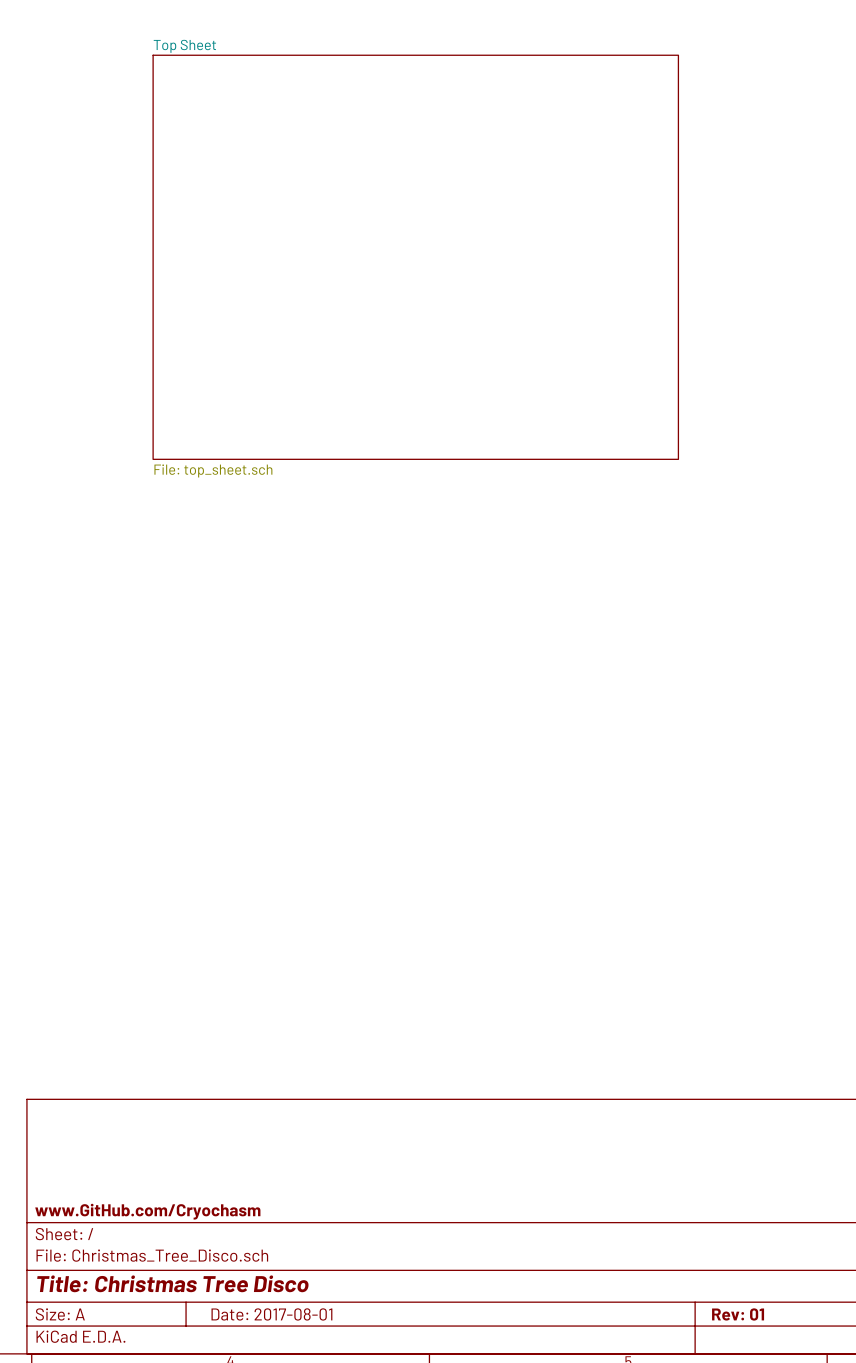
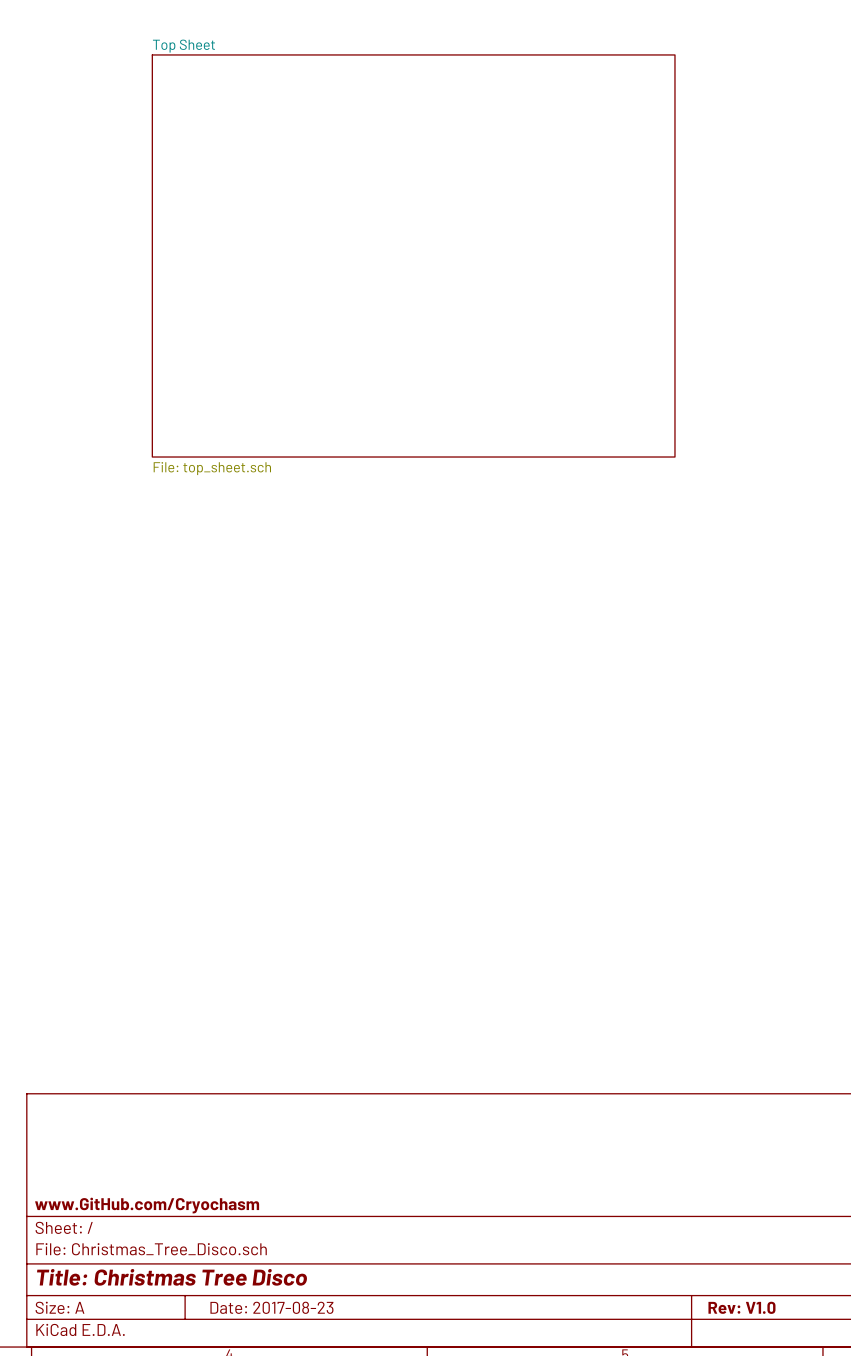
title block: Date: 2017-08-01 (271, 1314) -> Date: 2017-08-23 (271, 1307)
title block: Rev: 01 (738, 1314) -> Rev: V1.0 (741, 1307)

